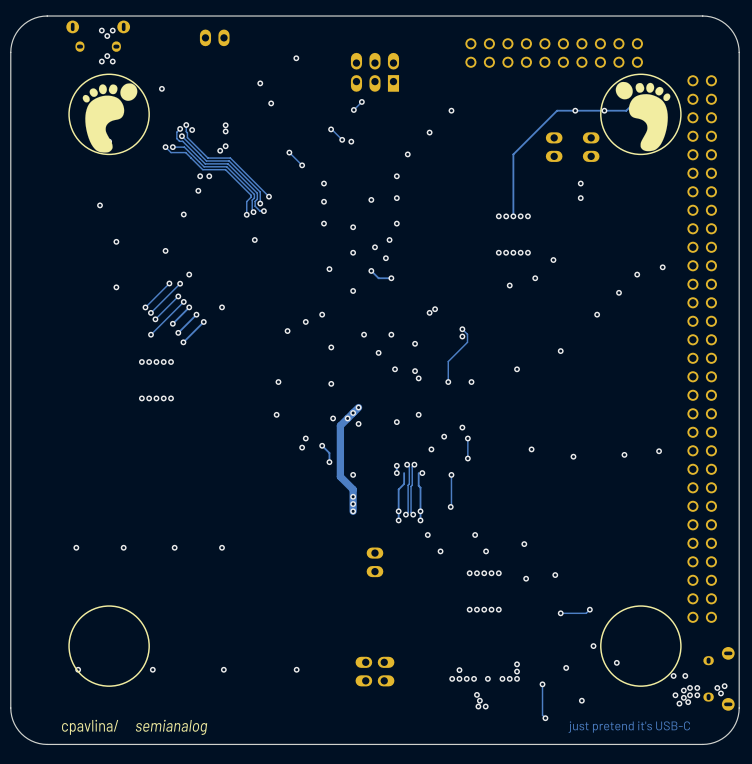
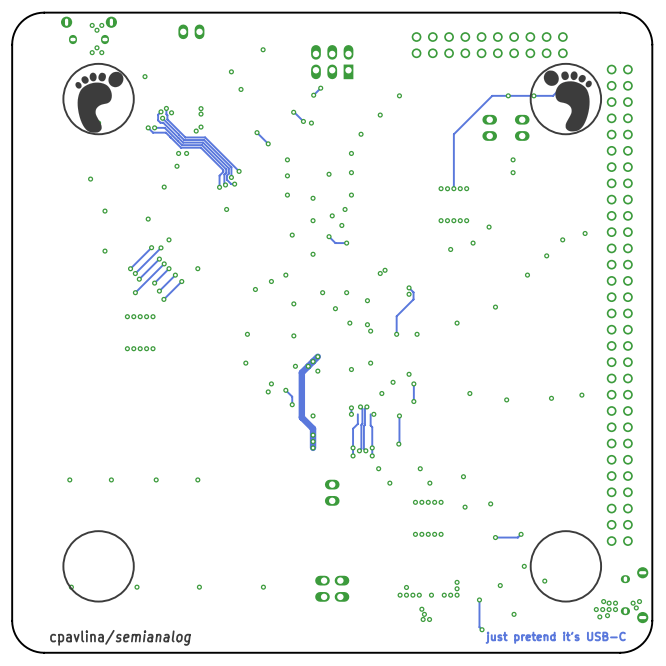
via: (673, 675) -> none
via: (685, 675) -> none
via: none -> (603, 601)
via: (683, 690) -> none
via: none -> (602, 609)
via: (683, 697) -> none

